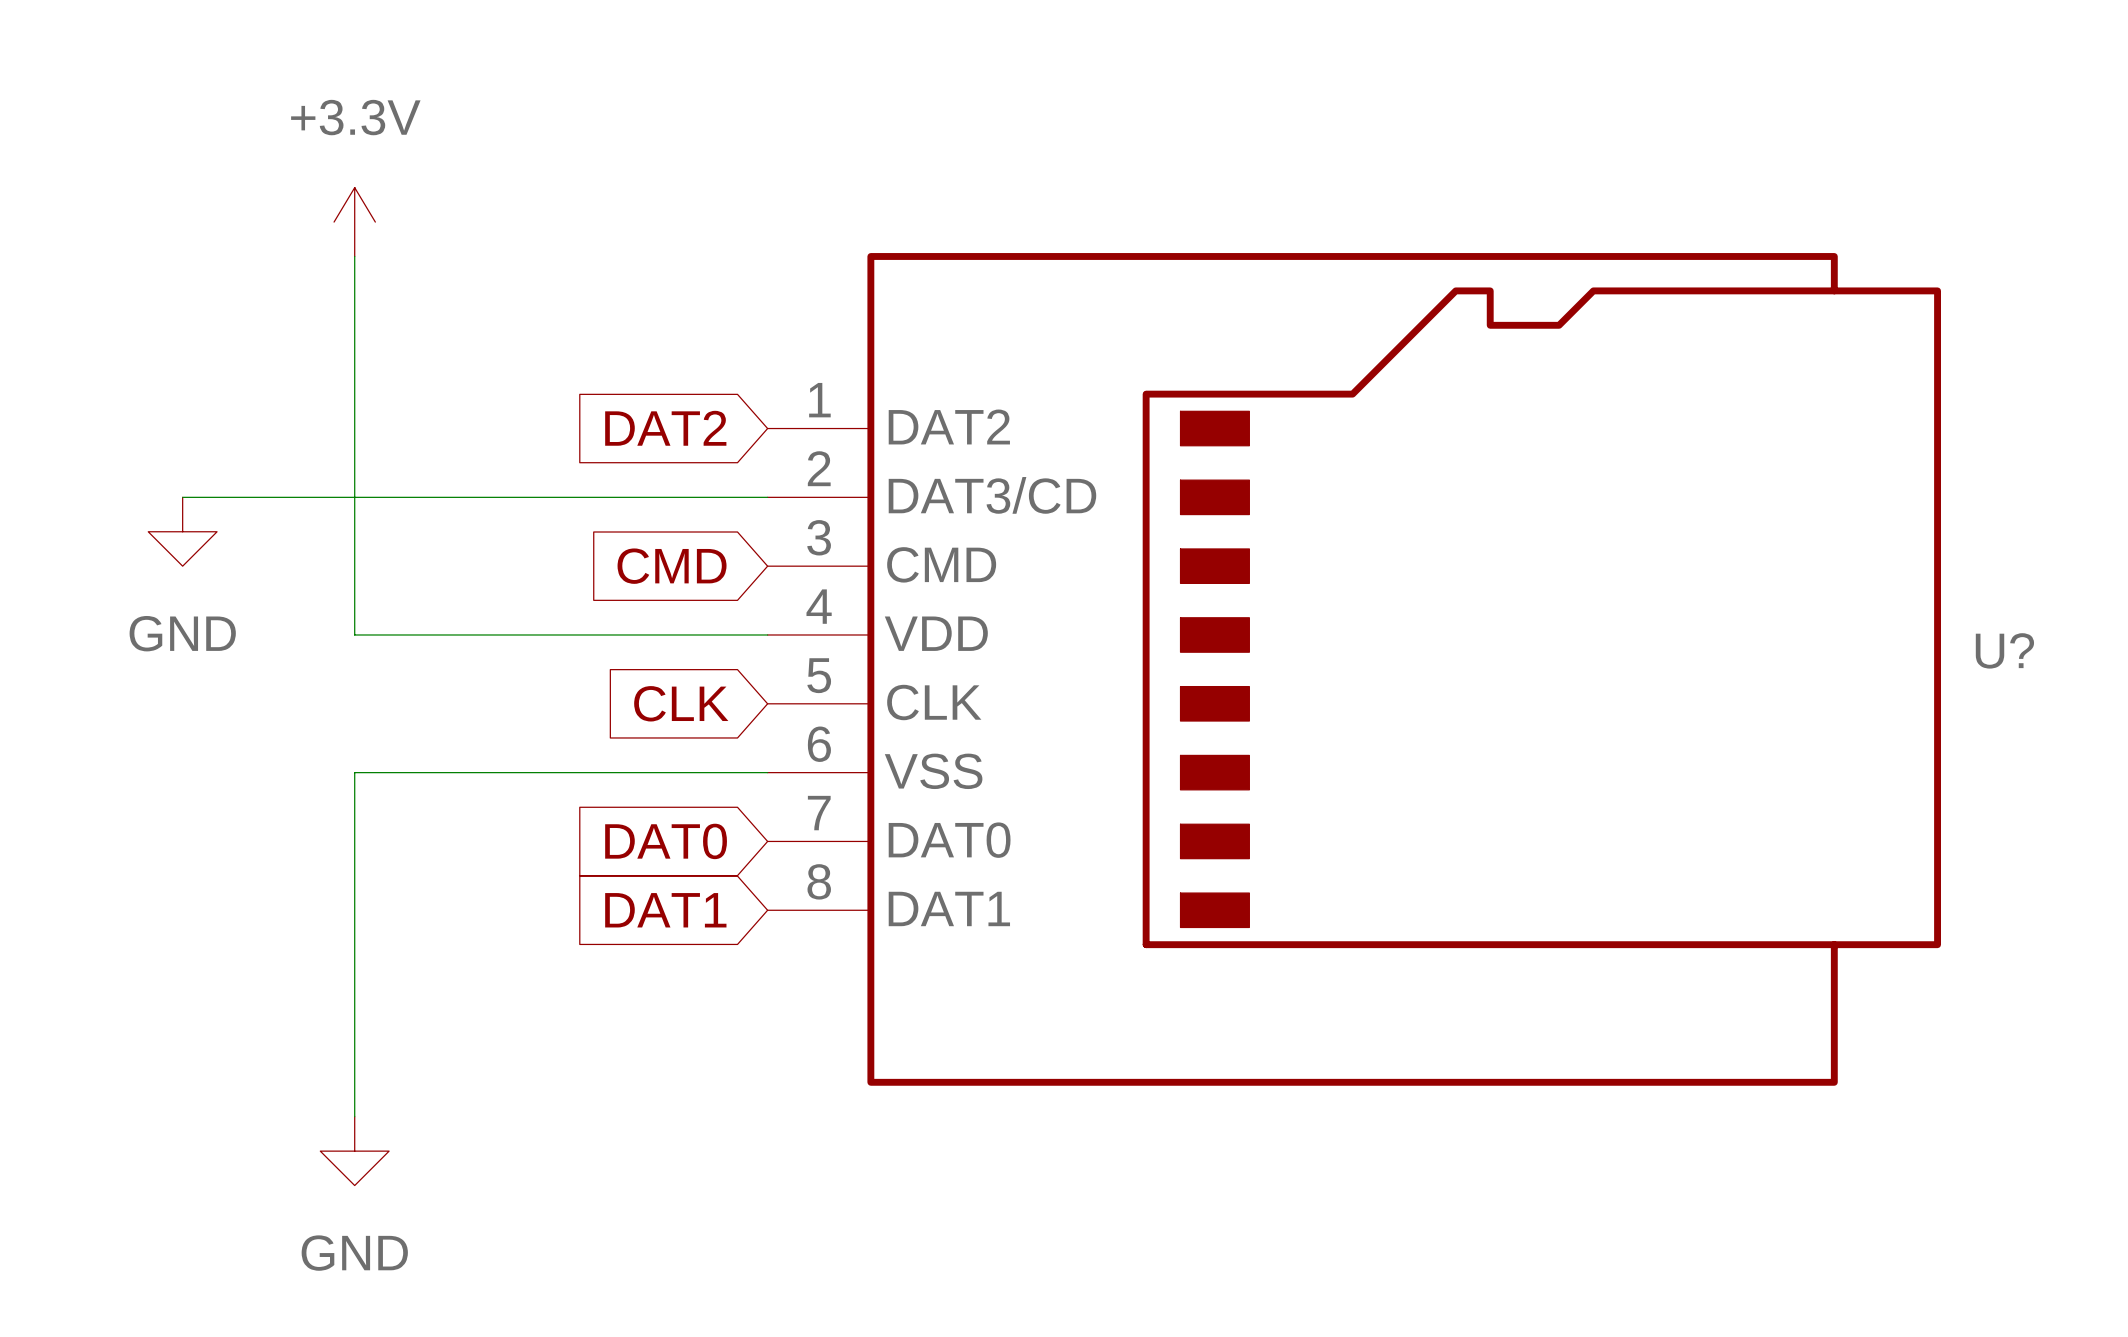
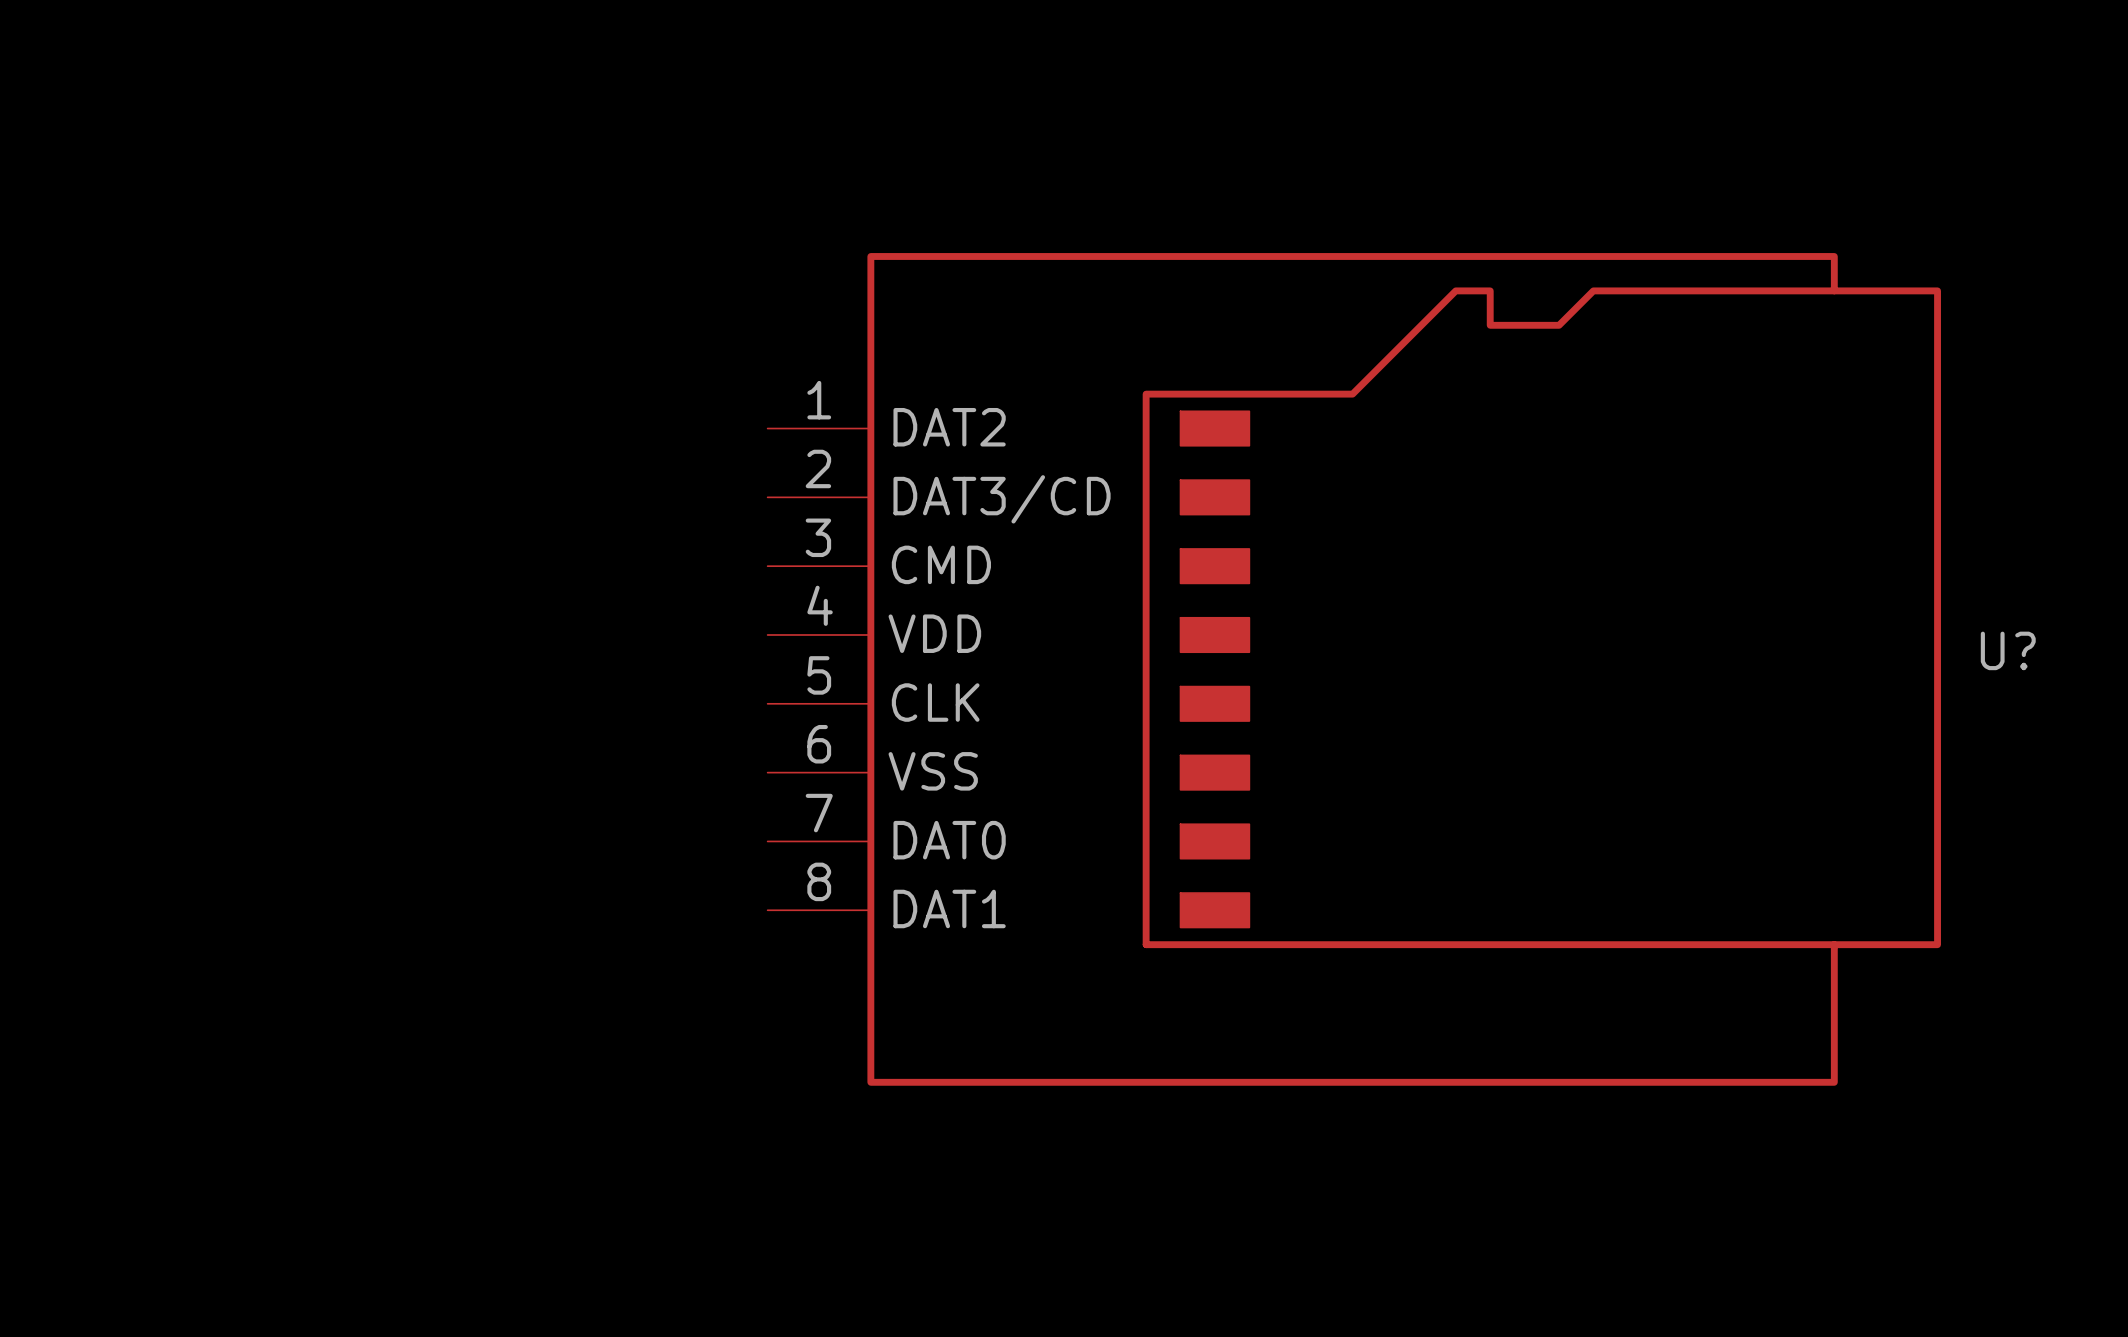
power symbol: +3.3V (354, 222) -> none
wire: (354, 256) (354, 634) (767, 634) -> none
global label: DAT2 (665, 428) -> none
wire: (182, 497) (767, 497) -> none
power symbol: GND (182, 531) -> none
global label: CMD (672, 566) -> none
global label: CLK (681, 703) -> none
wire: (767, 772) (354, 772) (354, 1116) -> none
global label: DAT0 (666, 841) -> none
global label: DAT1 (665, 910) -> none
power symbol: GND (354, 1151) -> none

